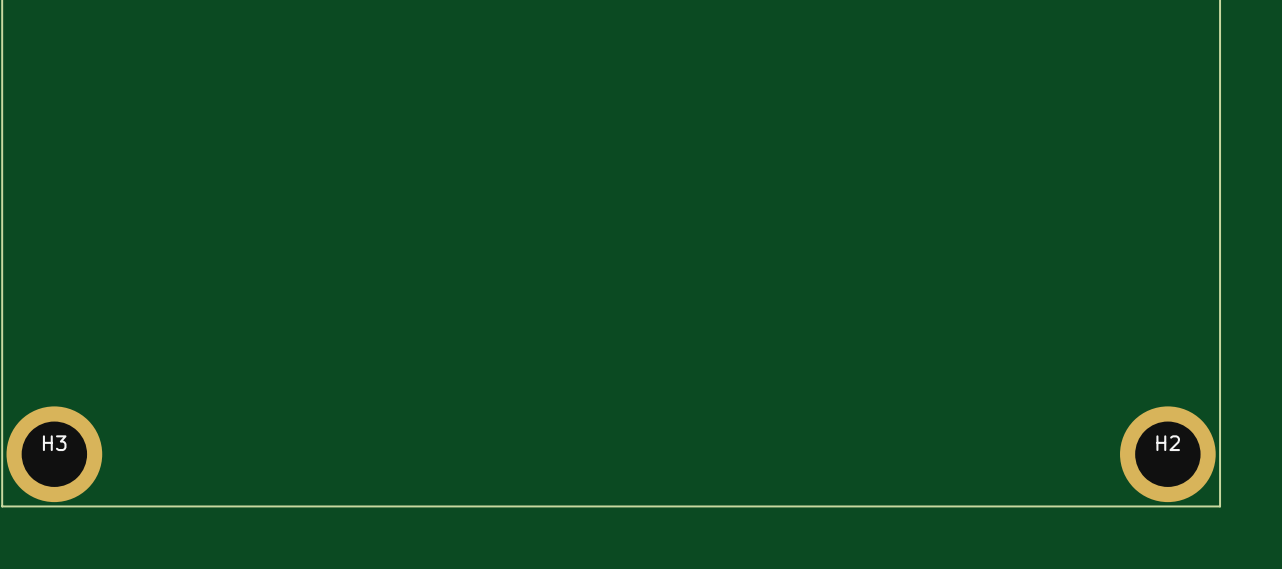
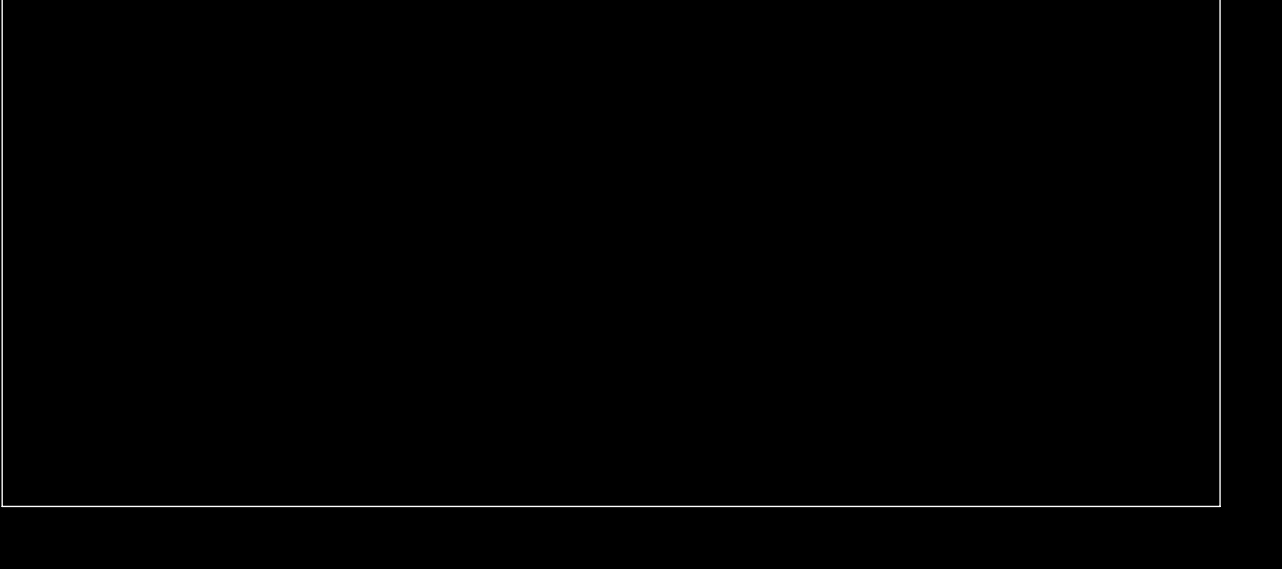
H3: (54, 454) -> none
H2: (1167, 454) -> none

